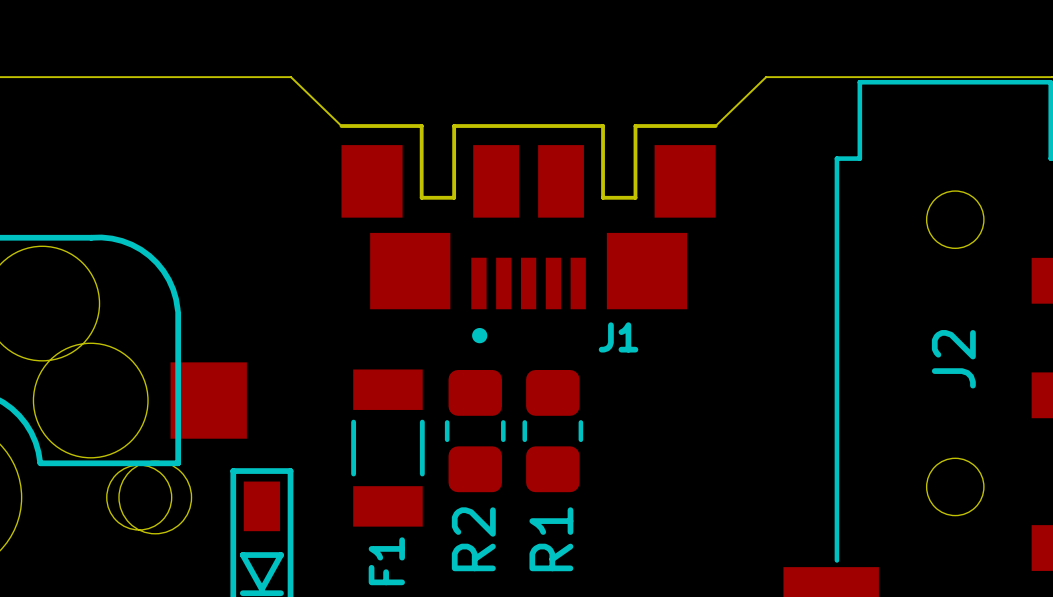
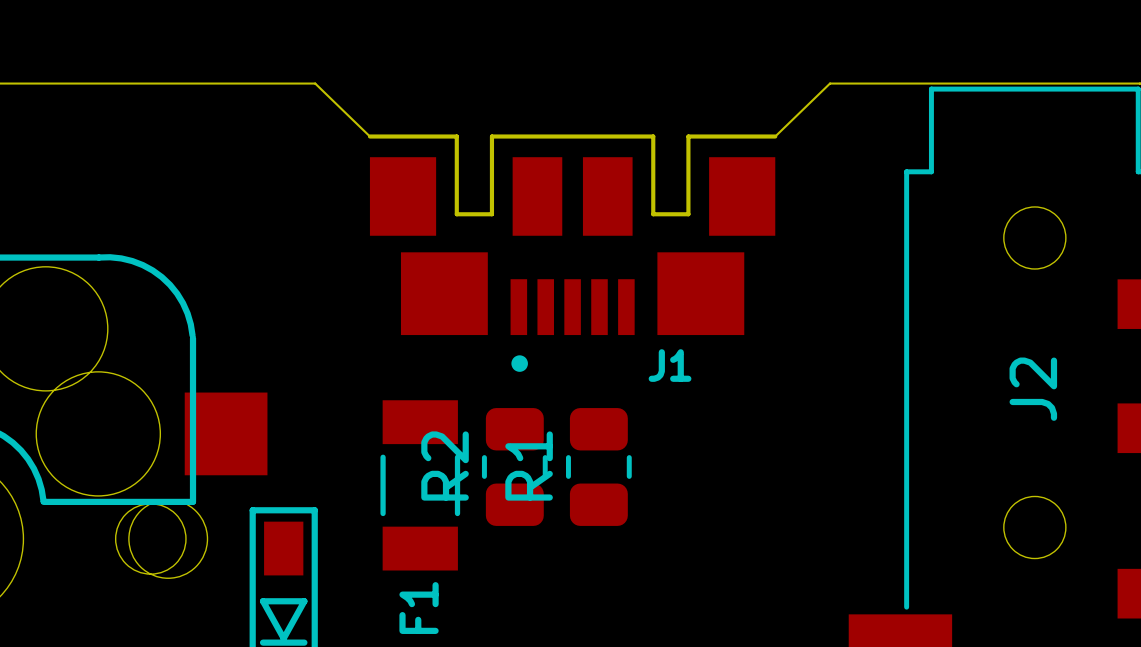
R2 footprint: [444, 370, 506, 493] -> [481, 408, 548, 526]
R1 footprint: [522, 370, 584, 493] -> [565, 408, 632, 526]
R2 name position: R2 (473, 539) -> R2 (445, 466)
R1 name position: R1 (551, 539) -> R1 (529, 466)

